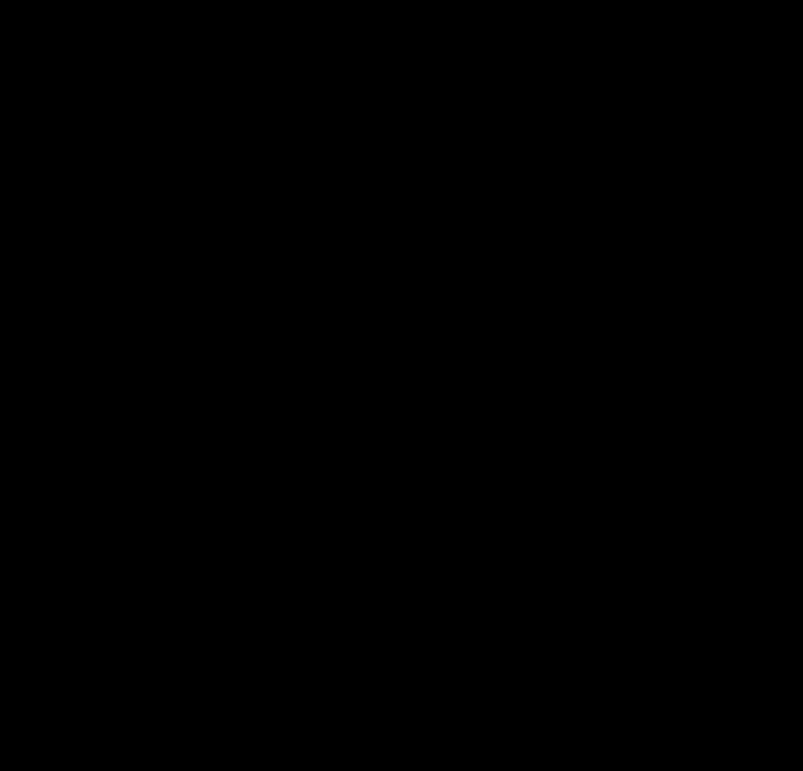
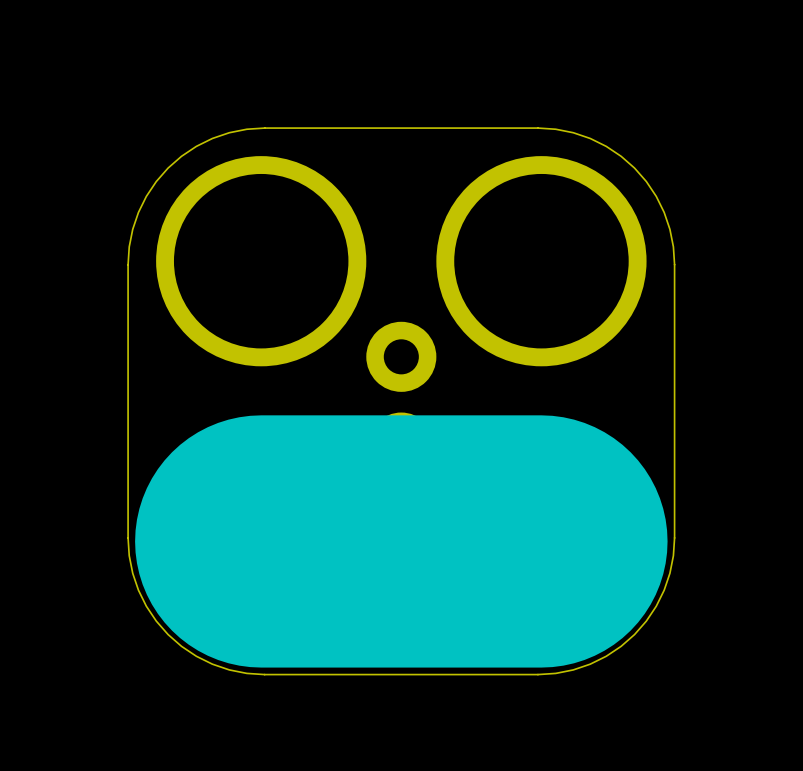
part: none -> (401, 401)

